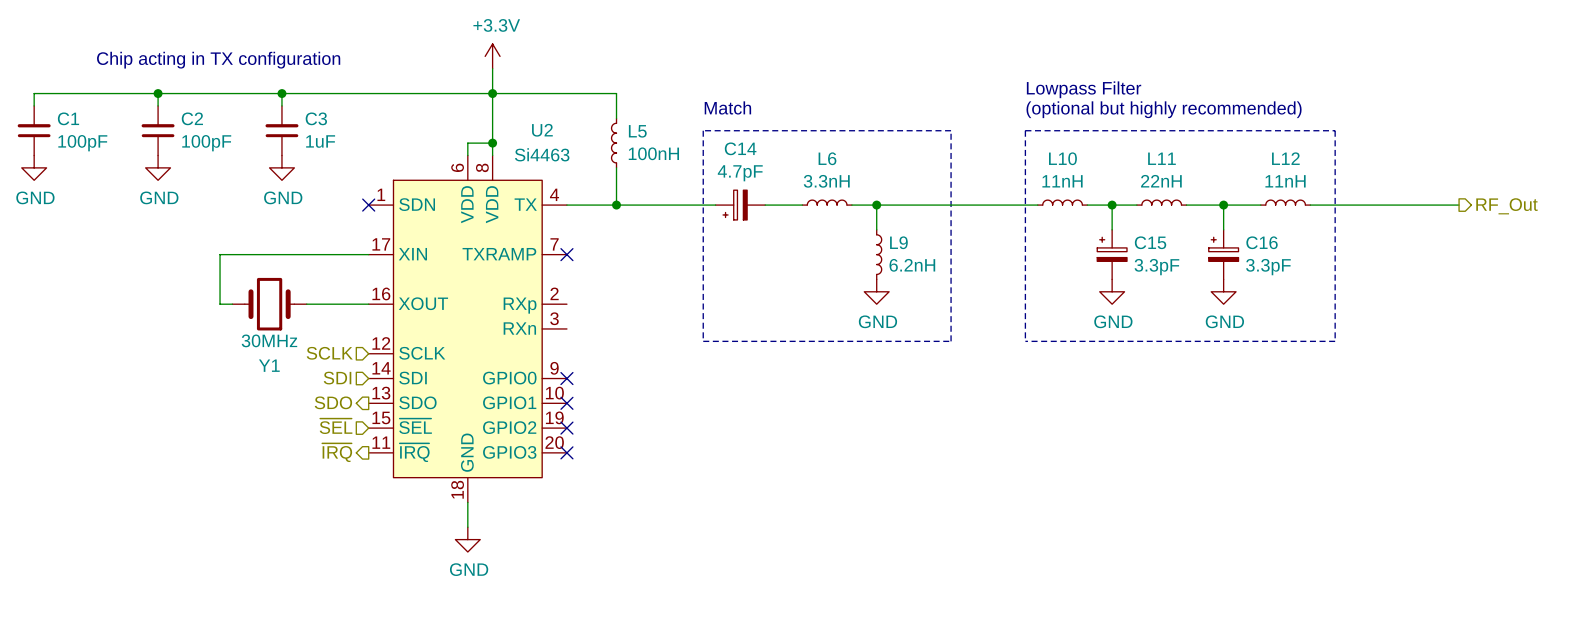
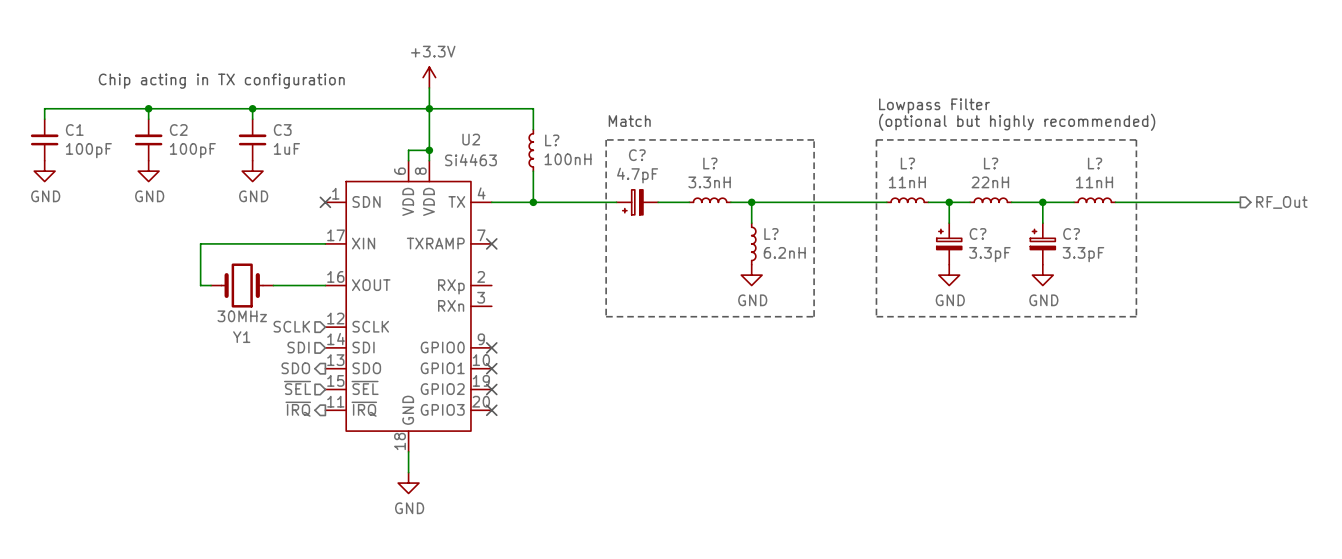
L5 name: L5 (637, 131) -> L? (552, 140)
C14 name: C14 (740, 148) -> C? (637, 155)
L6 name: L6 (827, 158) -> L? (710, 163)
L10 name: L10 (1062, 158) -> L? (907, 163)
L11 name: L11 (1161, 158) -> L? (991, 163)
L12 name: L12 (1285, 158) -> L? (1095, 163)
L9 name: L9 (898, 242) -> L? (771, 233)
C15 name: C15 (1150, 242) -> C? (978, 233)
C16 name: C16 (1262, 242) -> C? (1071, 233)

